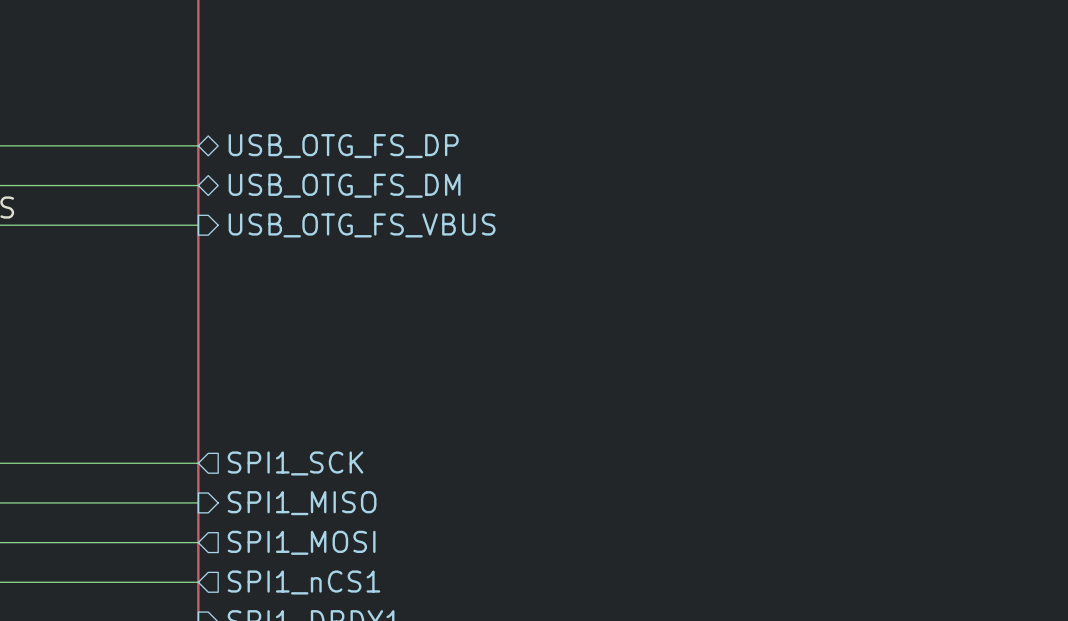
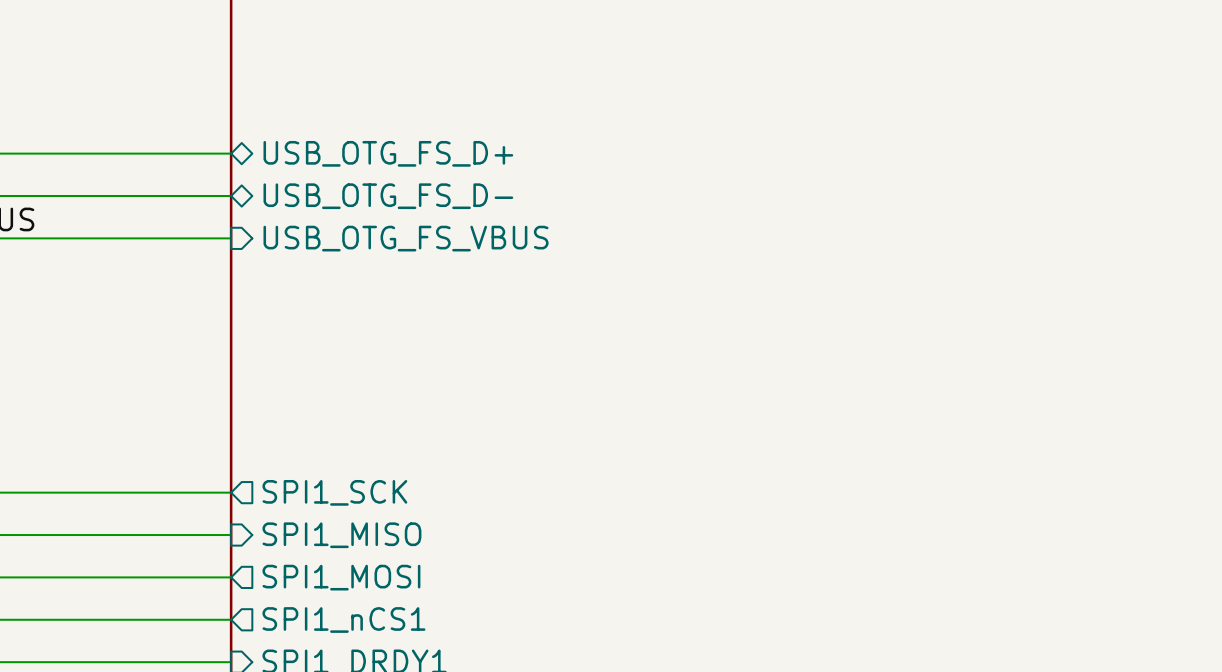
sheet pin: USB_OTG_FS_DP (343, 146) -> USB_OTG_FS_D+ (388, 153)
sheet pin: USB_OTG_FS_DM (344, 185) -> USB_OTG_FS_D- (388, 196)

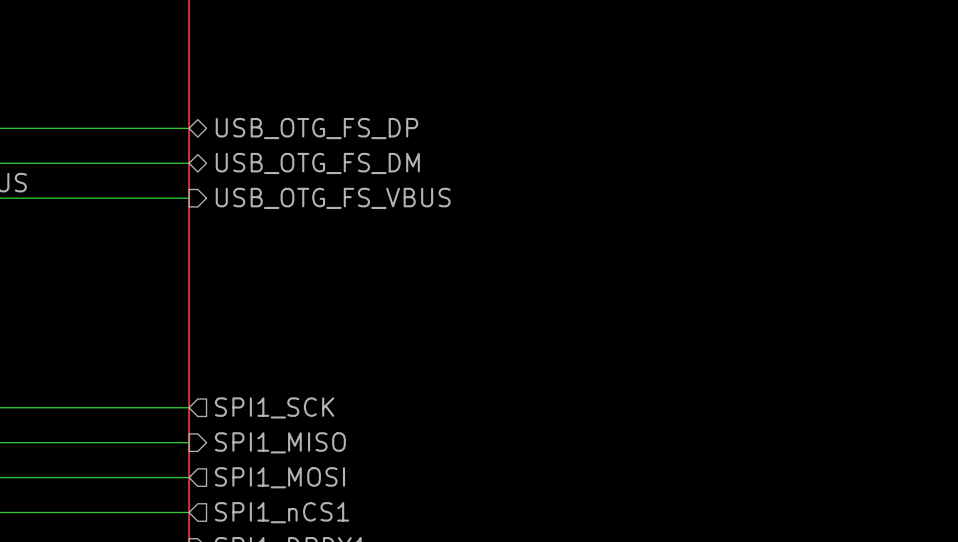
sheet pin: USB_OTG_FS_D+ (388, 153) -> USB_OTG_FS_DP (316, 128)
sheet pin: USB_OTG_FS_D- (388, 196) -> USB_OTG_FS_DM (317, 163)

